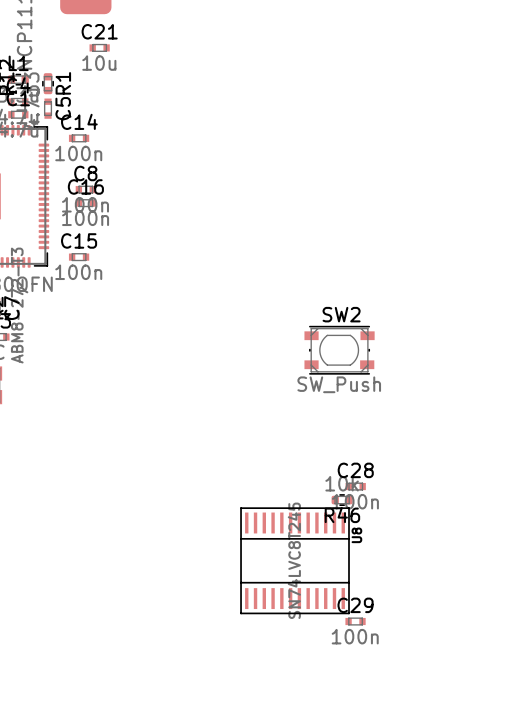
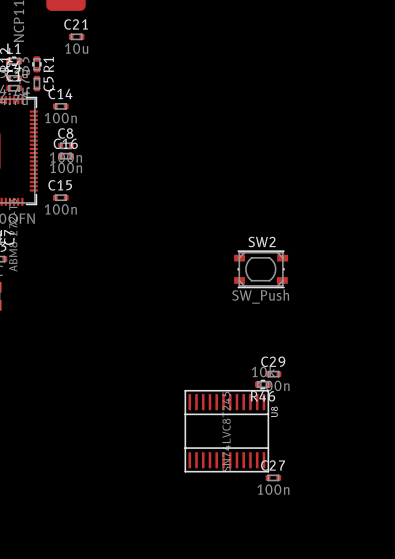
C28 name: C28 (355, 470) -> C29 (273, 361)
C29 name: C29 (355, 605) -> C27 (273, 465)

